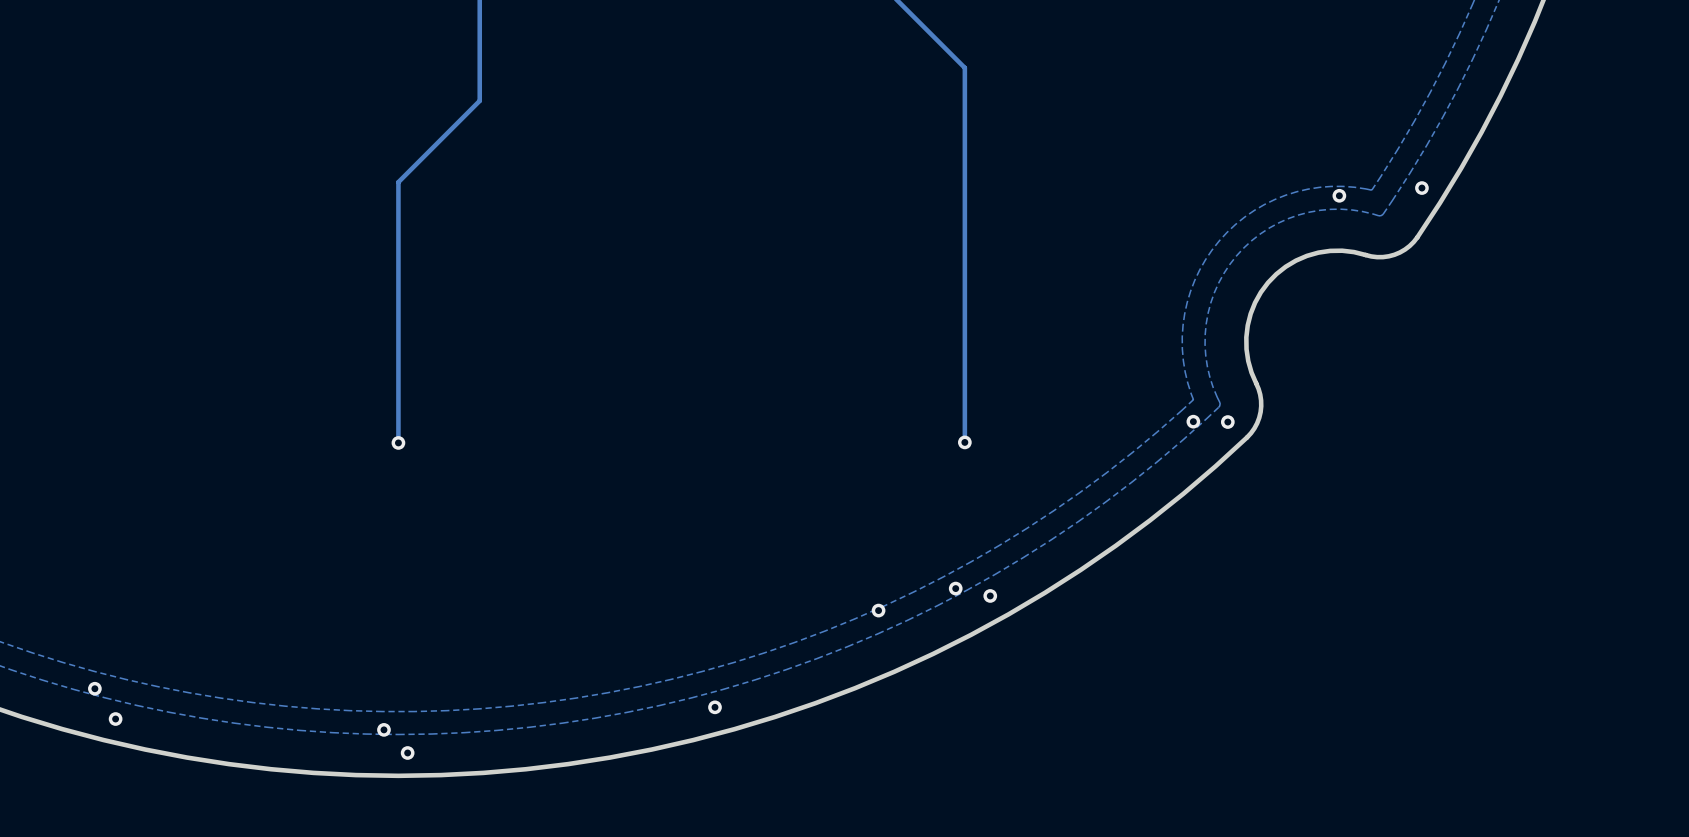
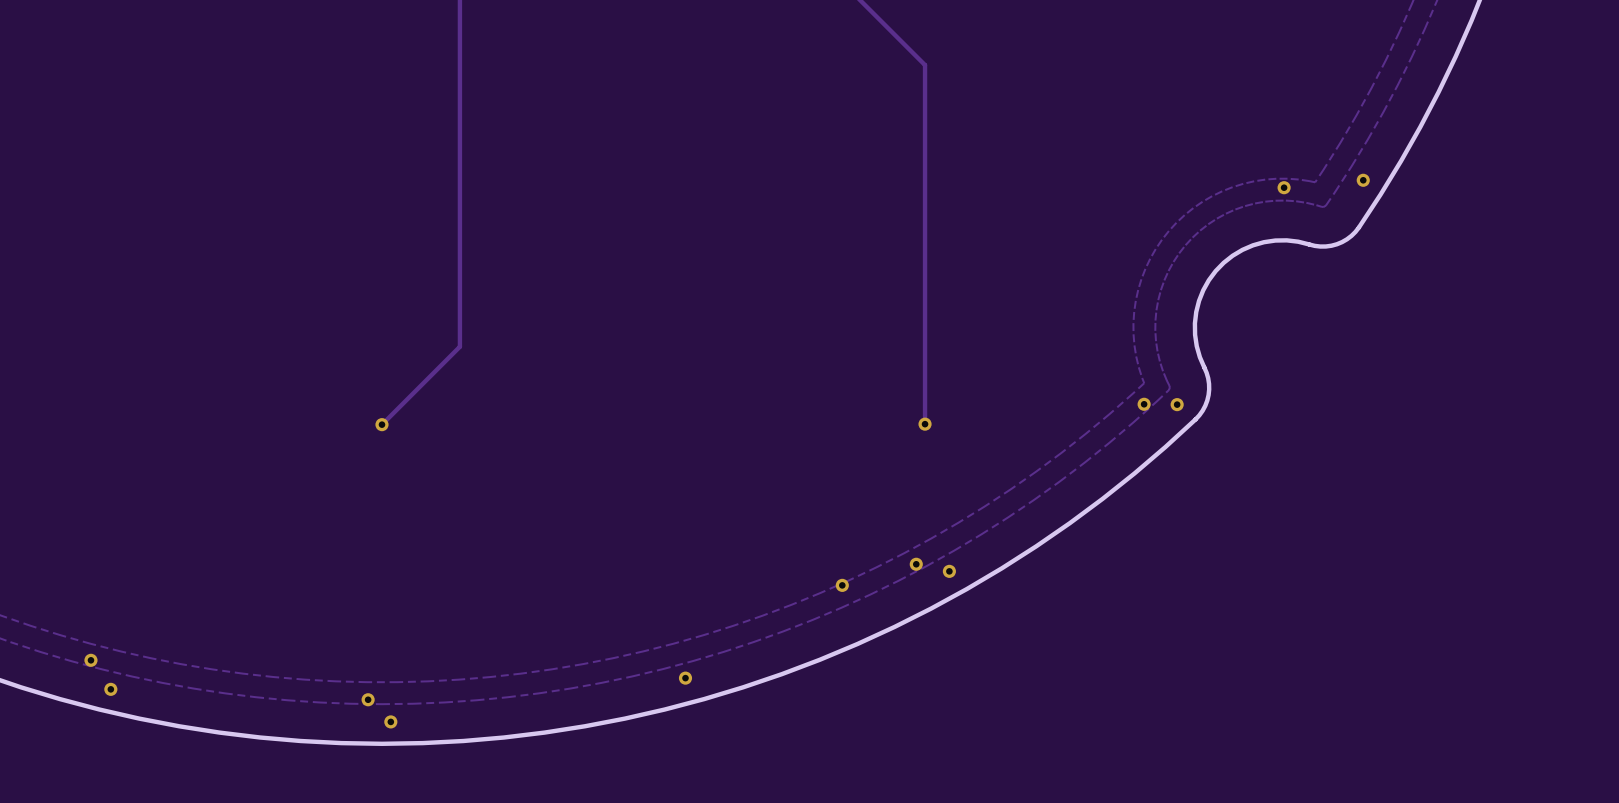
track: (479, 100) (398, 182) (398, 442) -> (459, 96) (459, 346) (381, 424)

